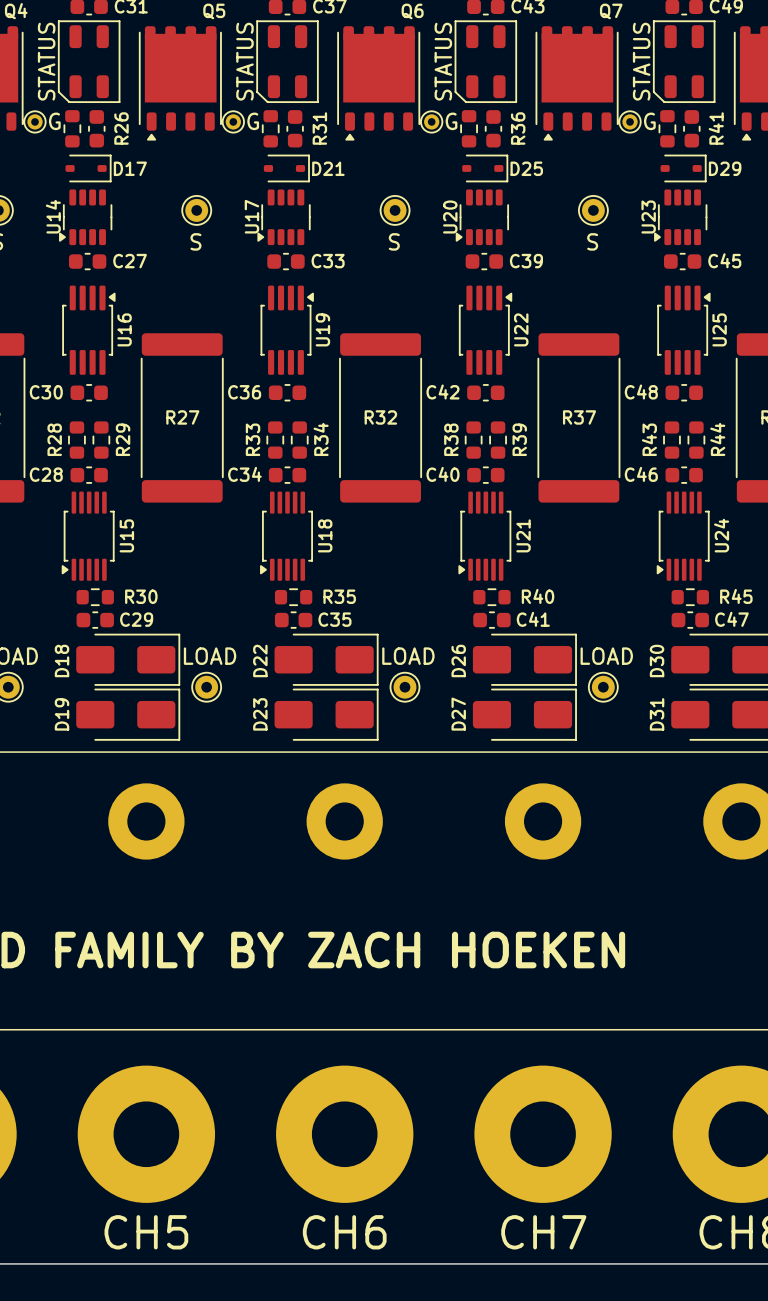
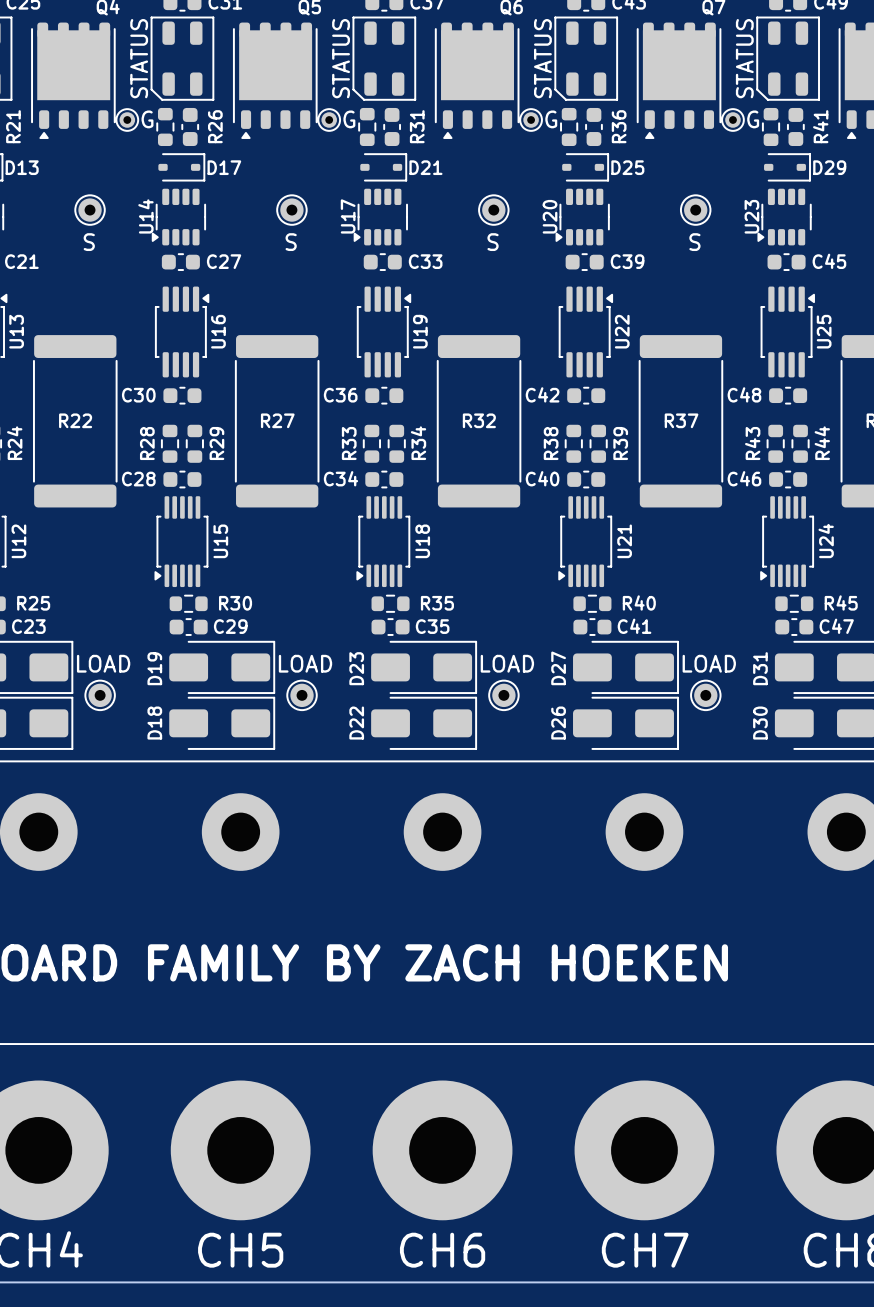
D18 name: D18 (62, 660) -> D19 (154, 668)
D22 name: D22 (260, 660) -> D23 (356, 668)
D26 name: D26 (458, 660) -> D27 (558, 668)
D30 name: D30 (657, 660) -> D31 (760, 668)
D19 name: D19 (62, 714) -> D18 (154, 723)
D23 name: D23 (260, 714) -> D22 (356, 723)
D27 name: D27 (458, 714) -> D26 (558, 723)
D31 name: D31 (657, 714) -> D30 (760, 723)

